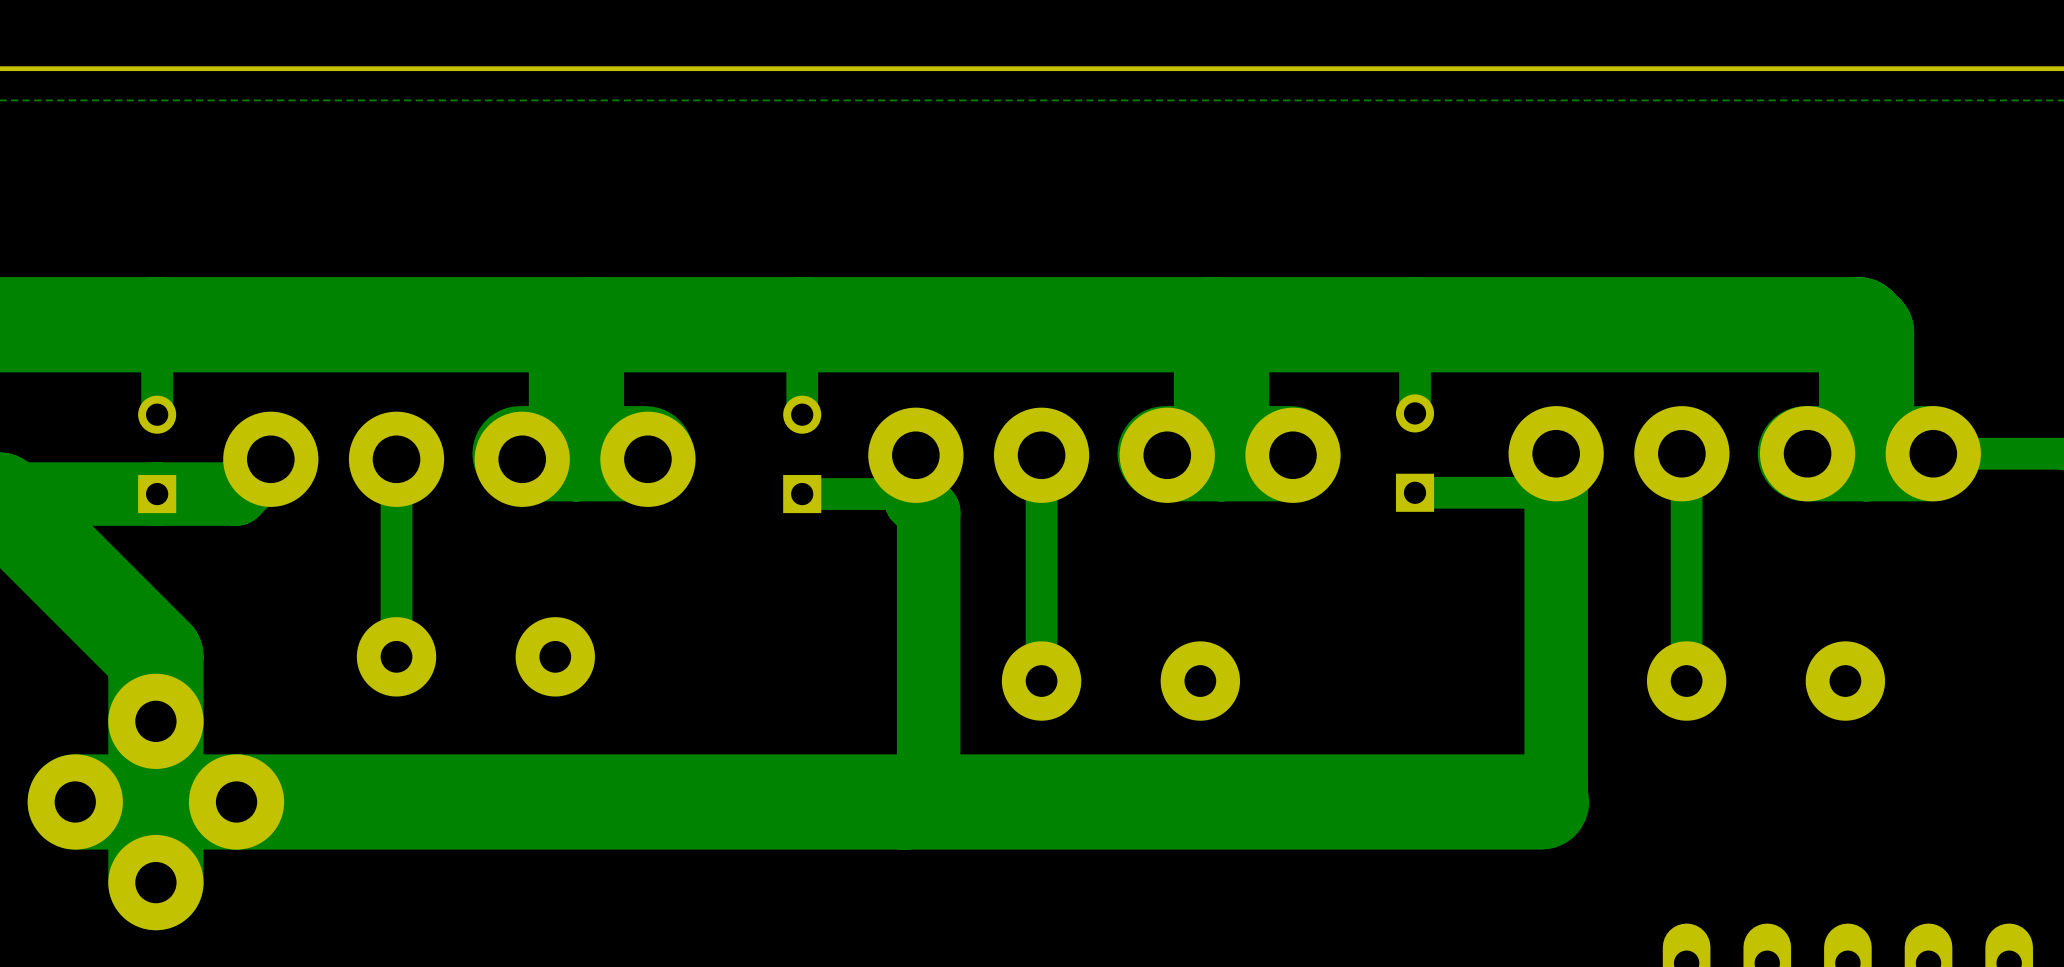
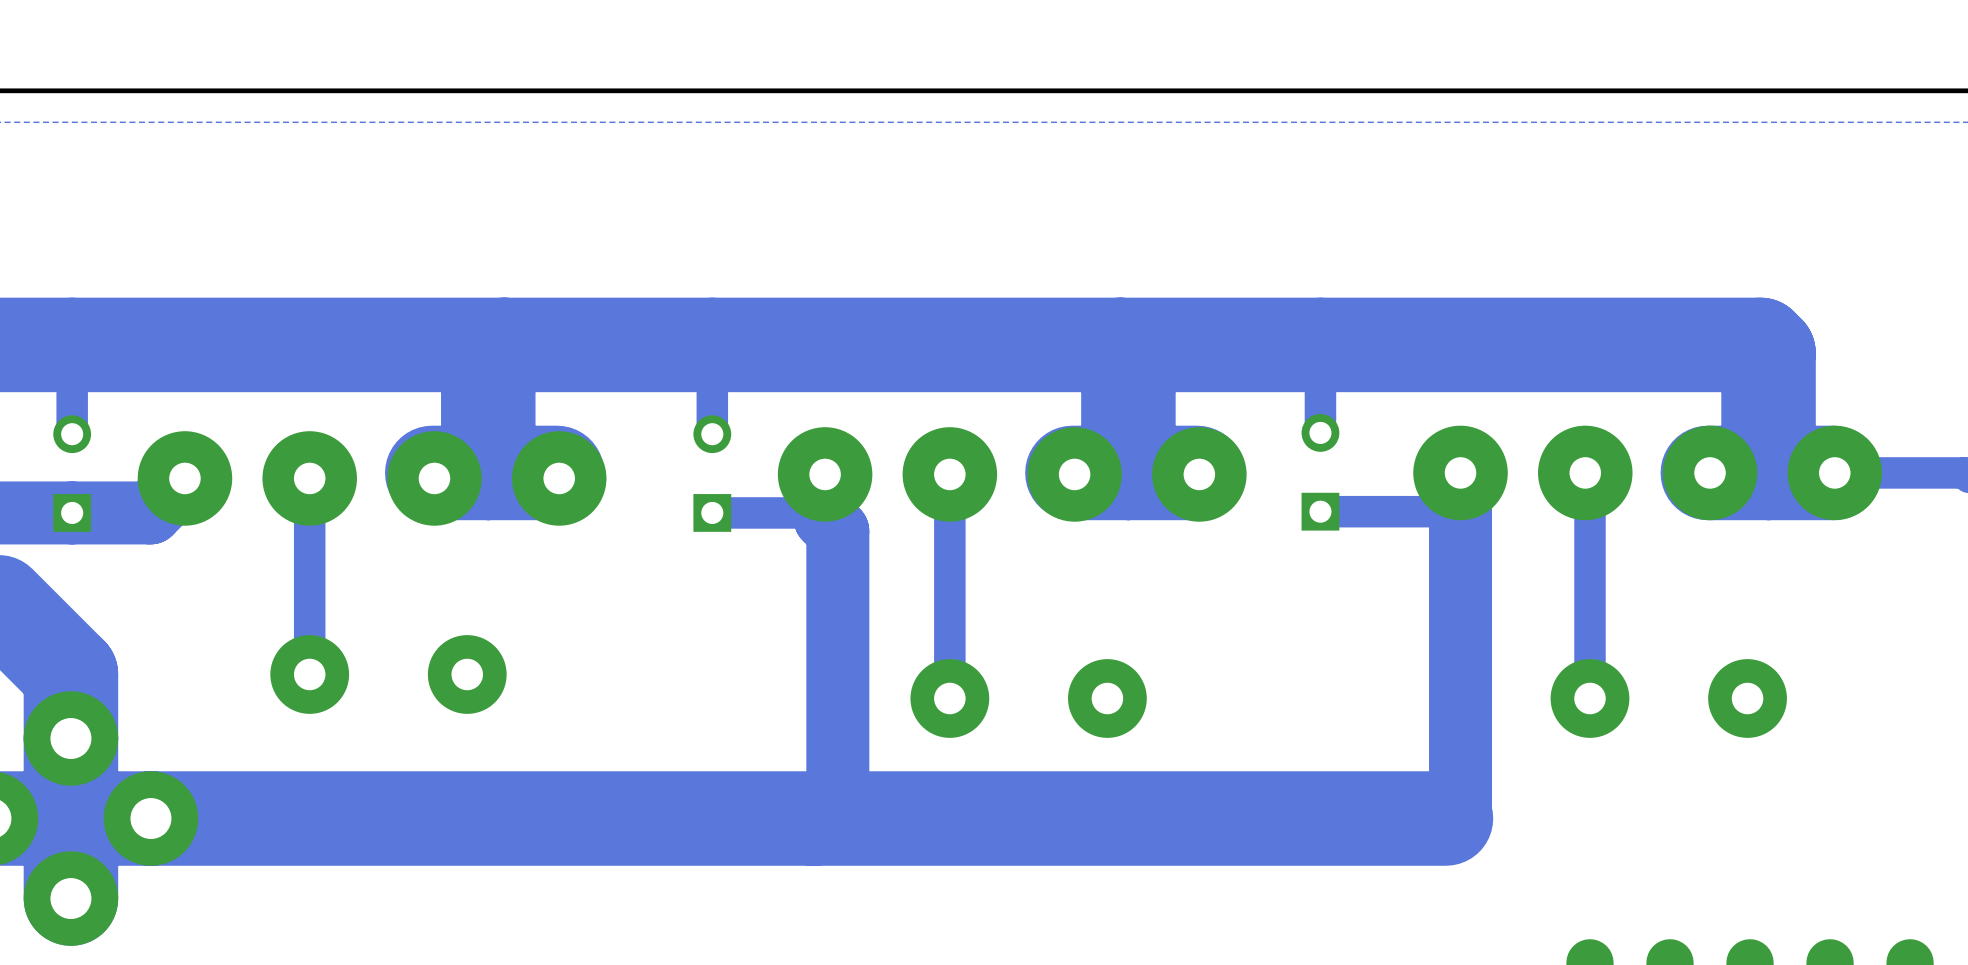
part footprint: [1508, 406, 1981, 502] -> [1413, 425, 1883, 521]
part footprint: [868, 407, 1341, 503] -> [777, 427, 1247, 522]
part footprint: [223, 411, 696, 507] -> [137, 431, 607, 526]

